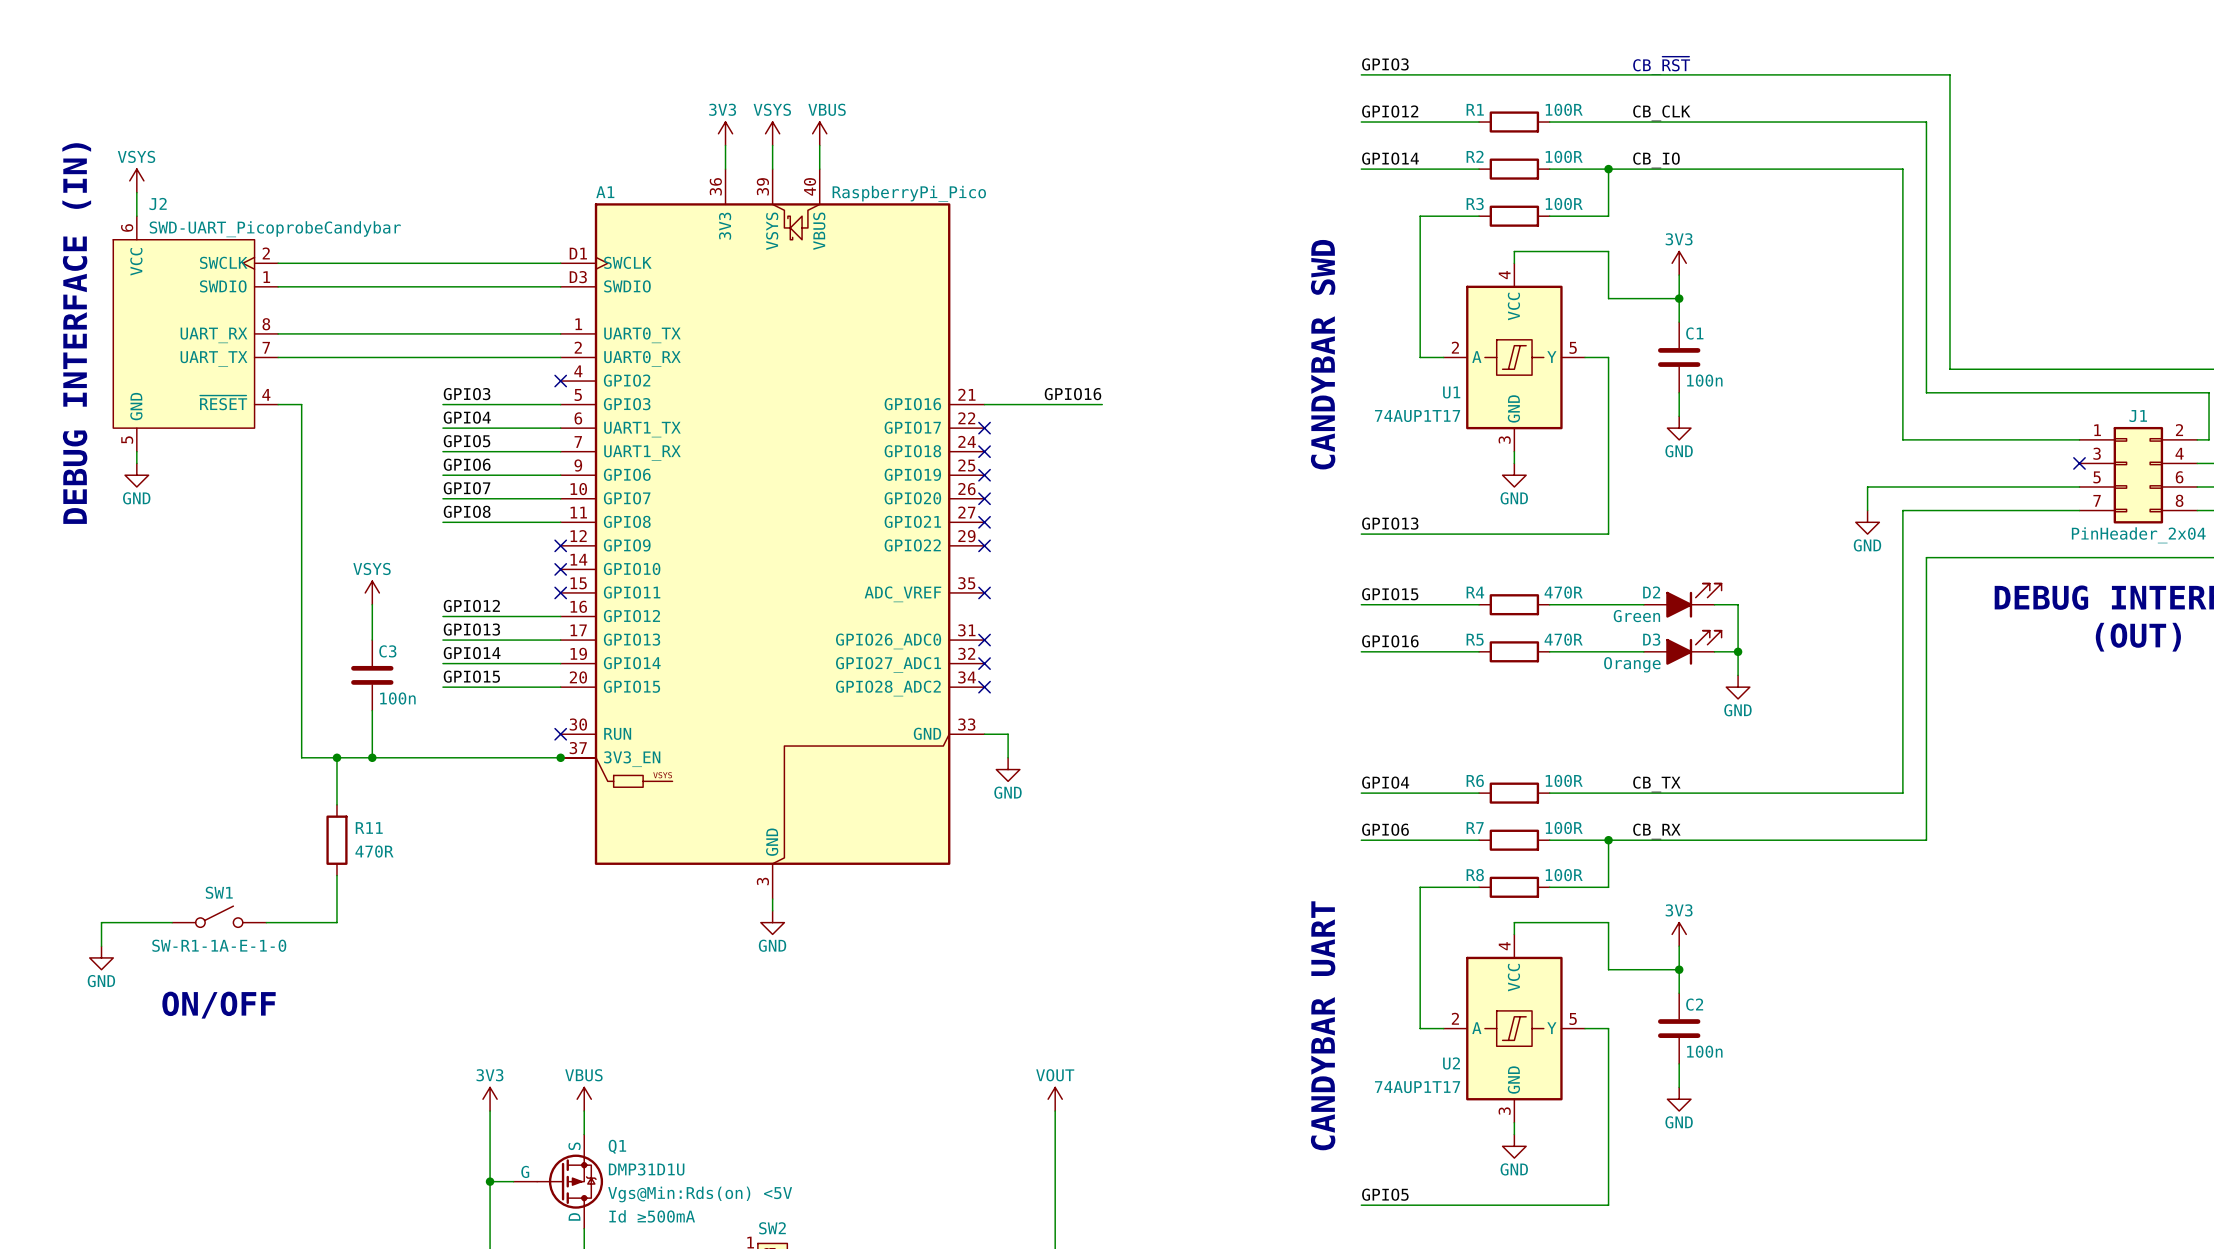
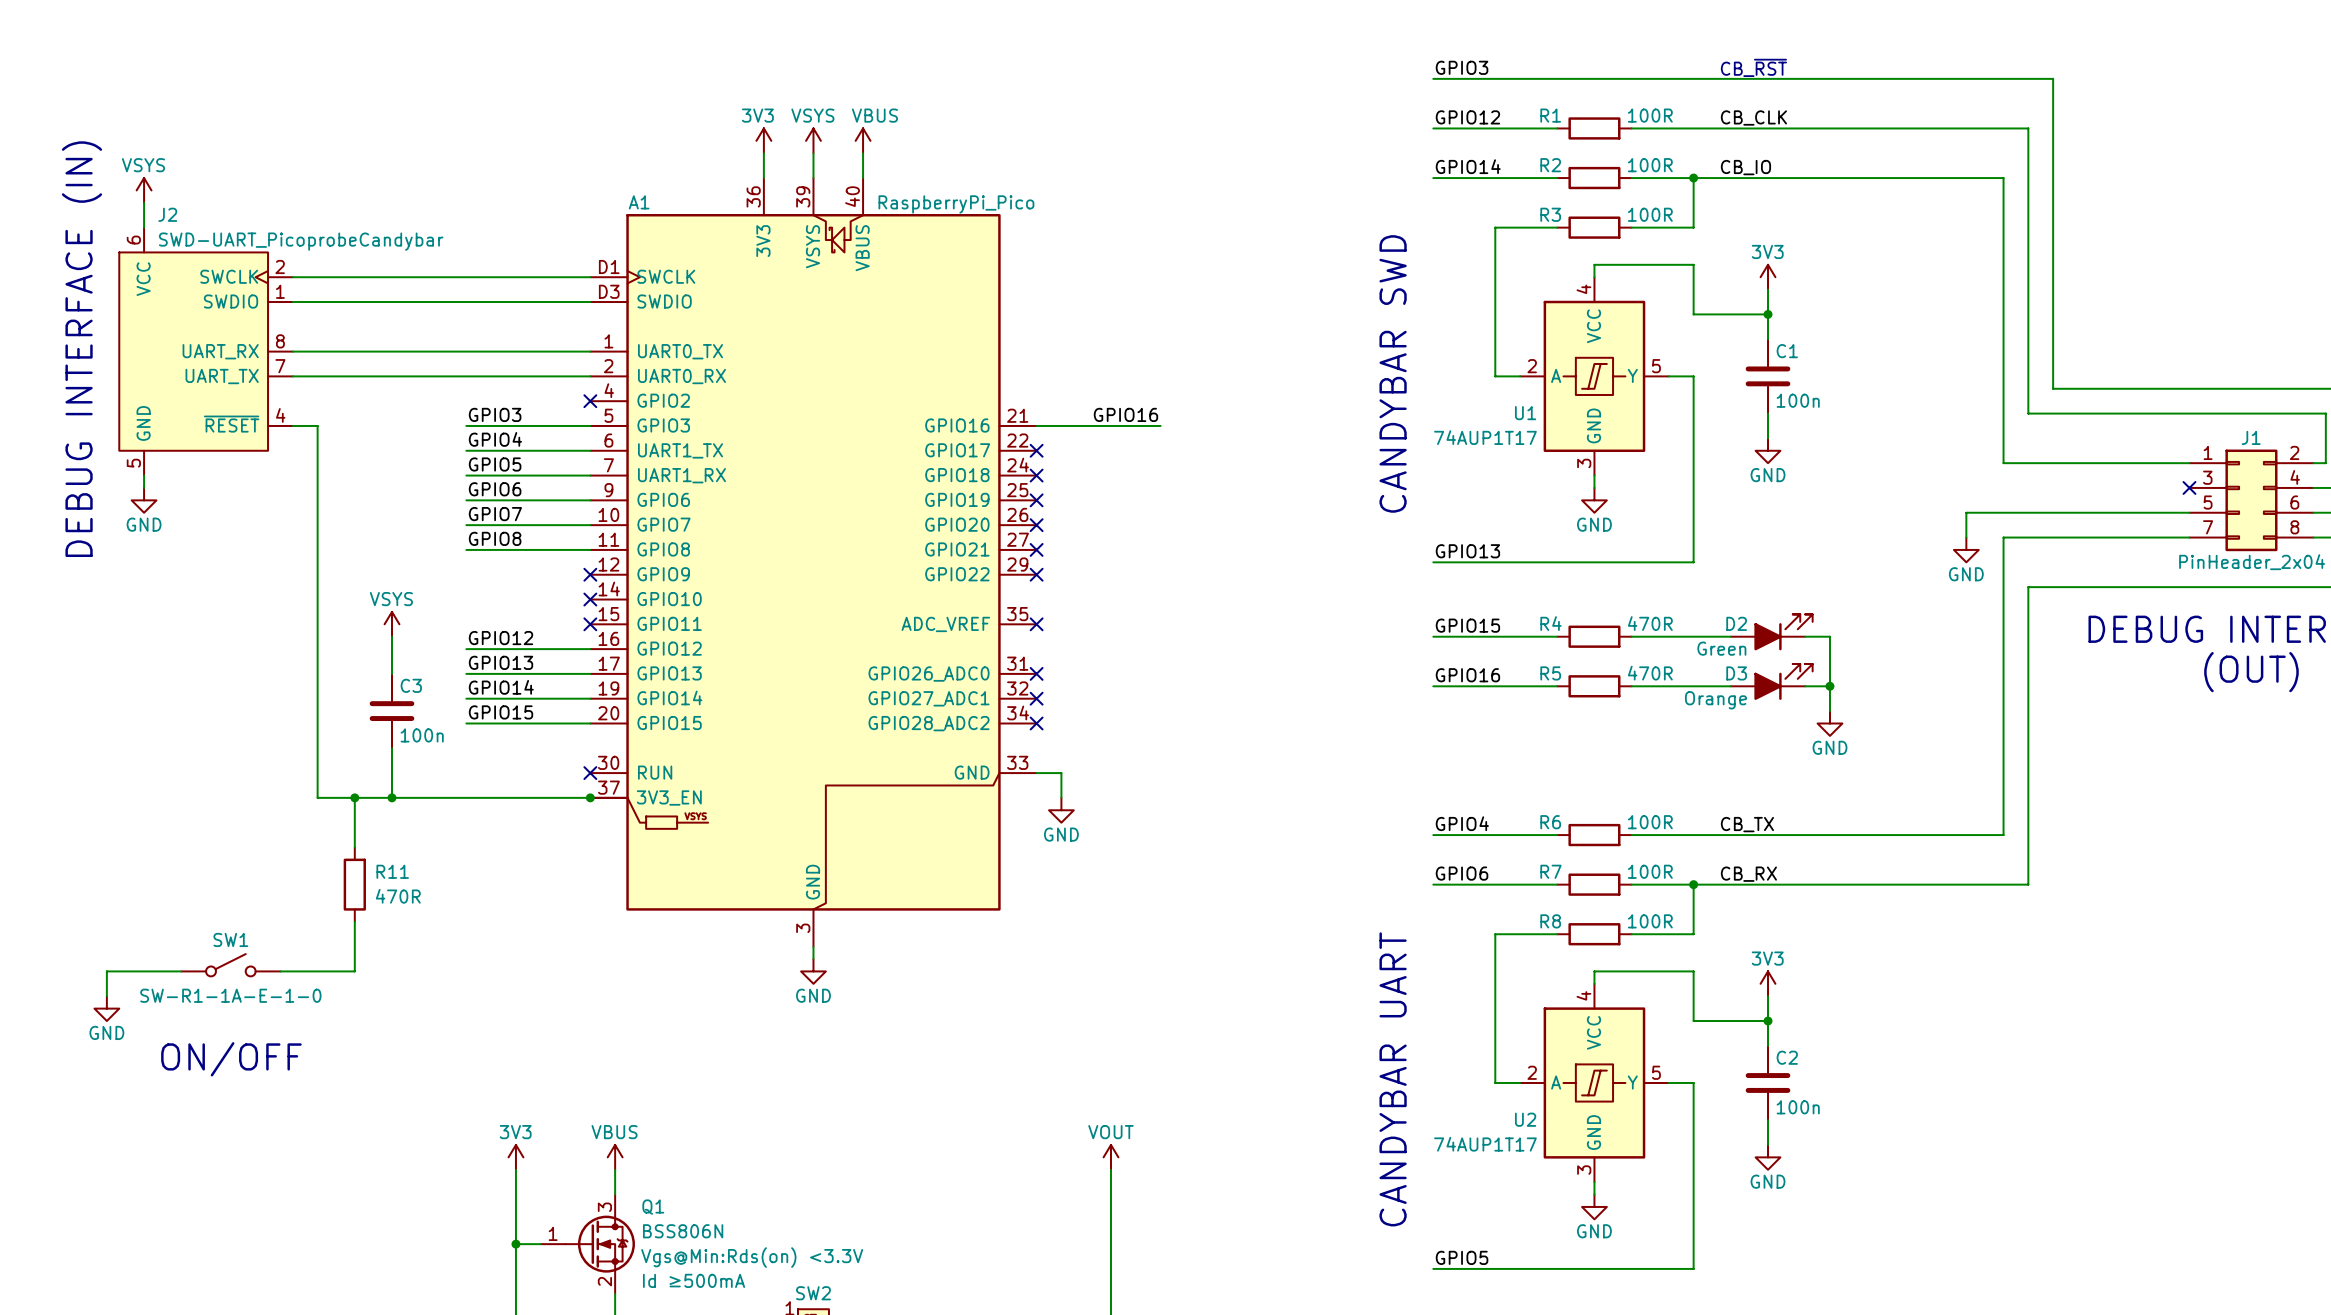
Q1 symbol: [513, 1134, 604, 1229] -> [540, 1194, 635, 1294]
Q1 value: DMP31D1U (646, 1169) -> BSS806N (683, 1231)
Q1 text: Vgs@Min:Rds(on) <5V (700, 1194) -> Vgs@Min:Rds(on) <3.3V (752, 1257)

